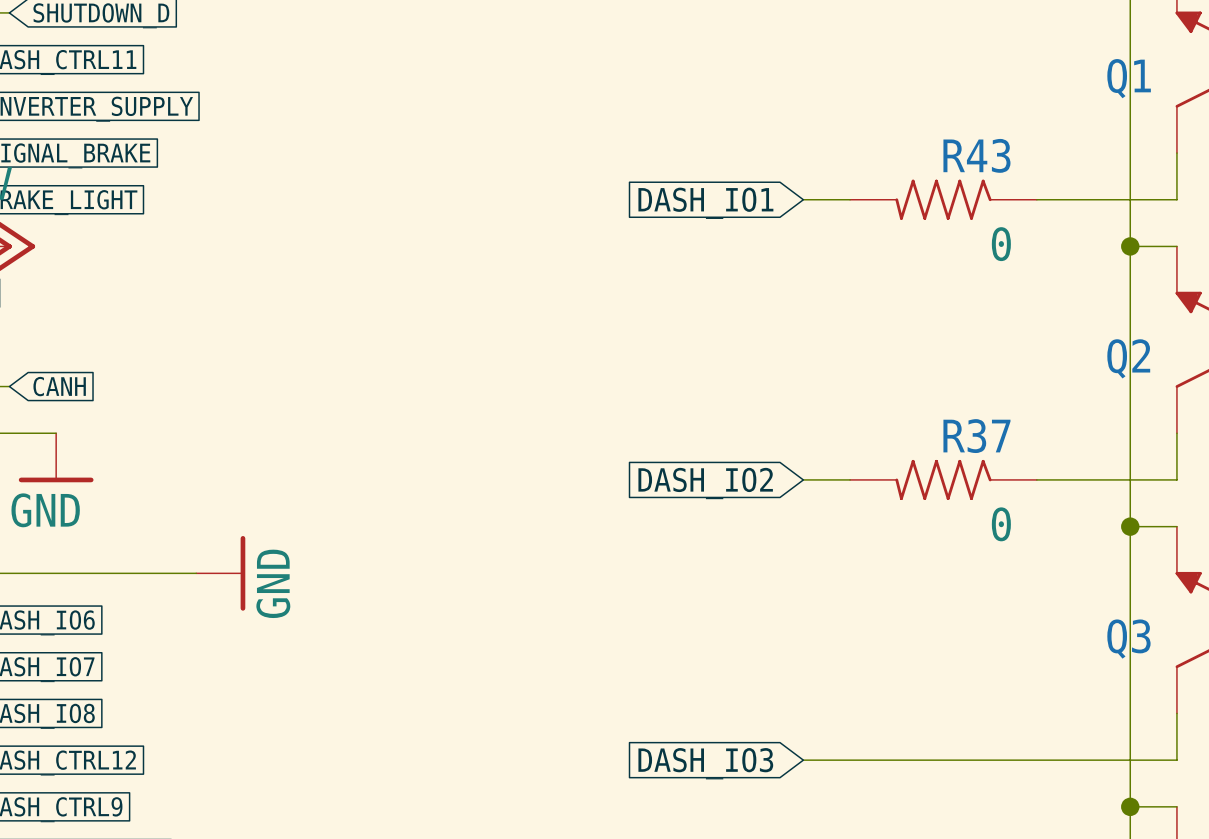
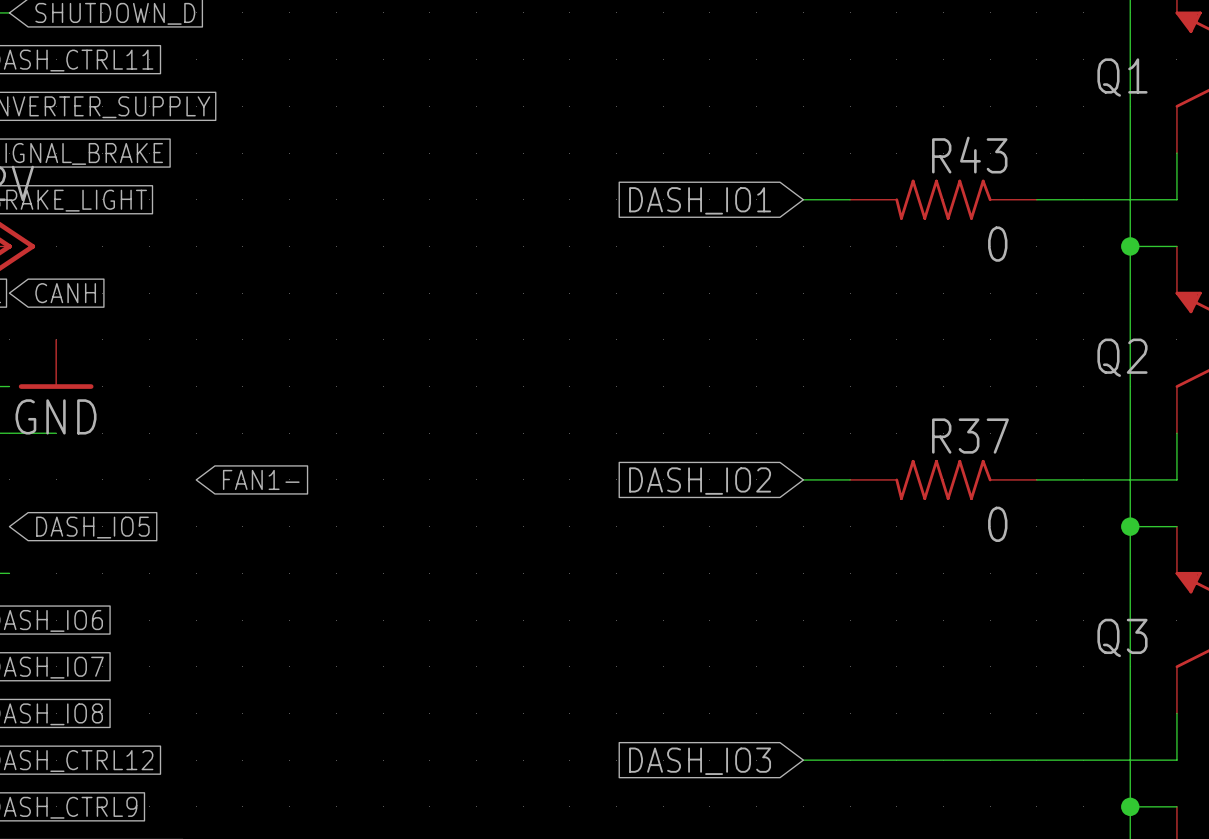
global label position: CANH (59, 386) -> CANH (65, 293)
power symbol position: GND (56, 457) -> GND (56, 364)
global label: none -> FAN1- (261, 479)
global label: none -> DASH_IO5 (92, 527)
wire: (9, 573) (196, 573) -> none
power symbol: GND (220, 573) -> none

